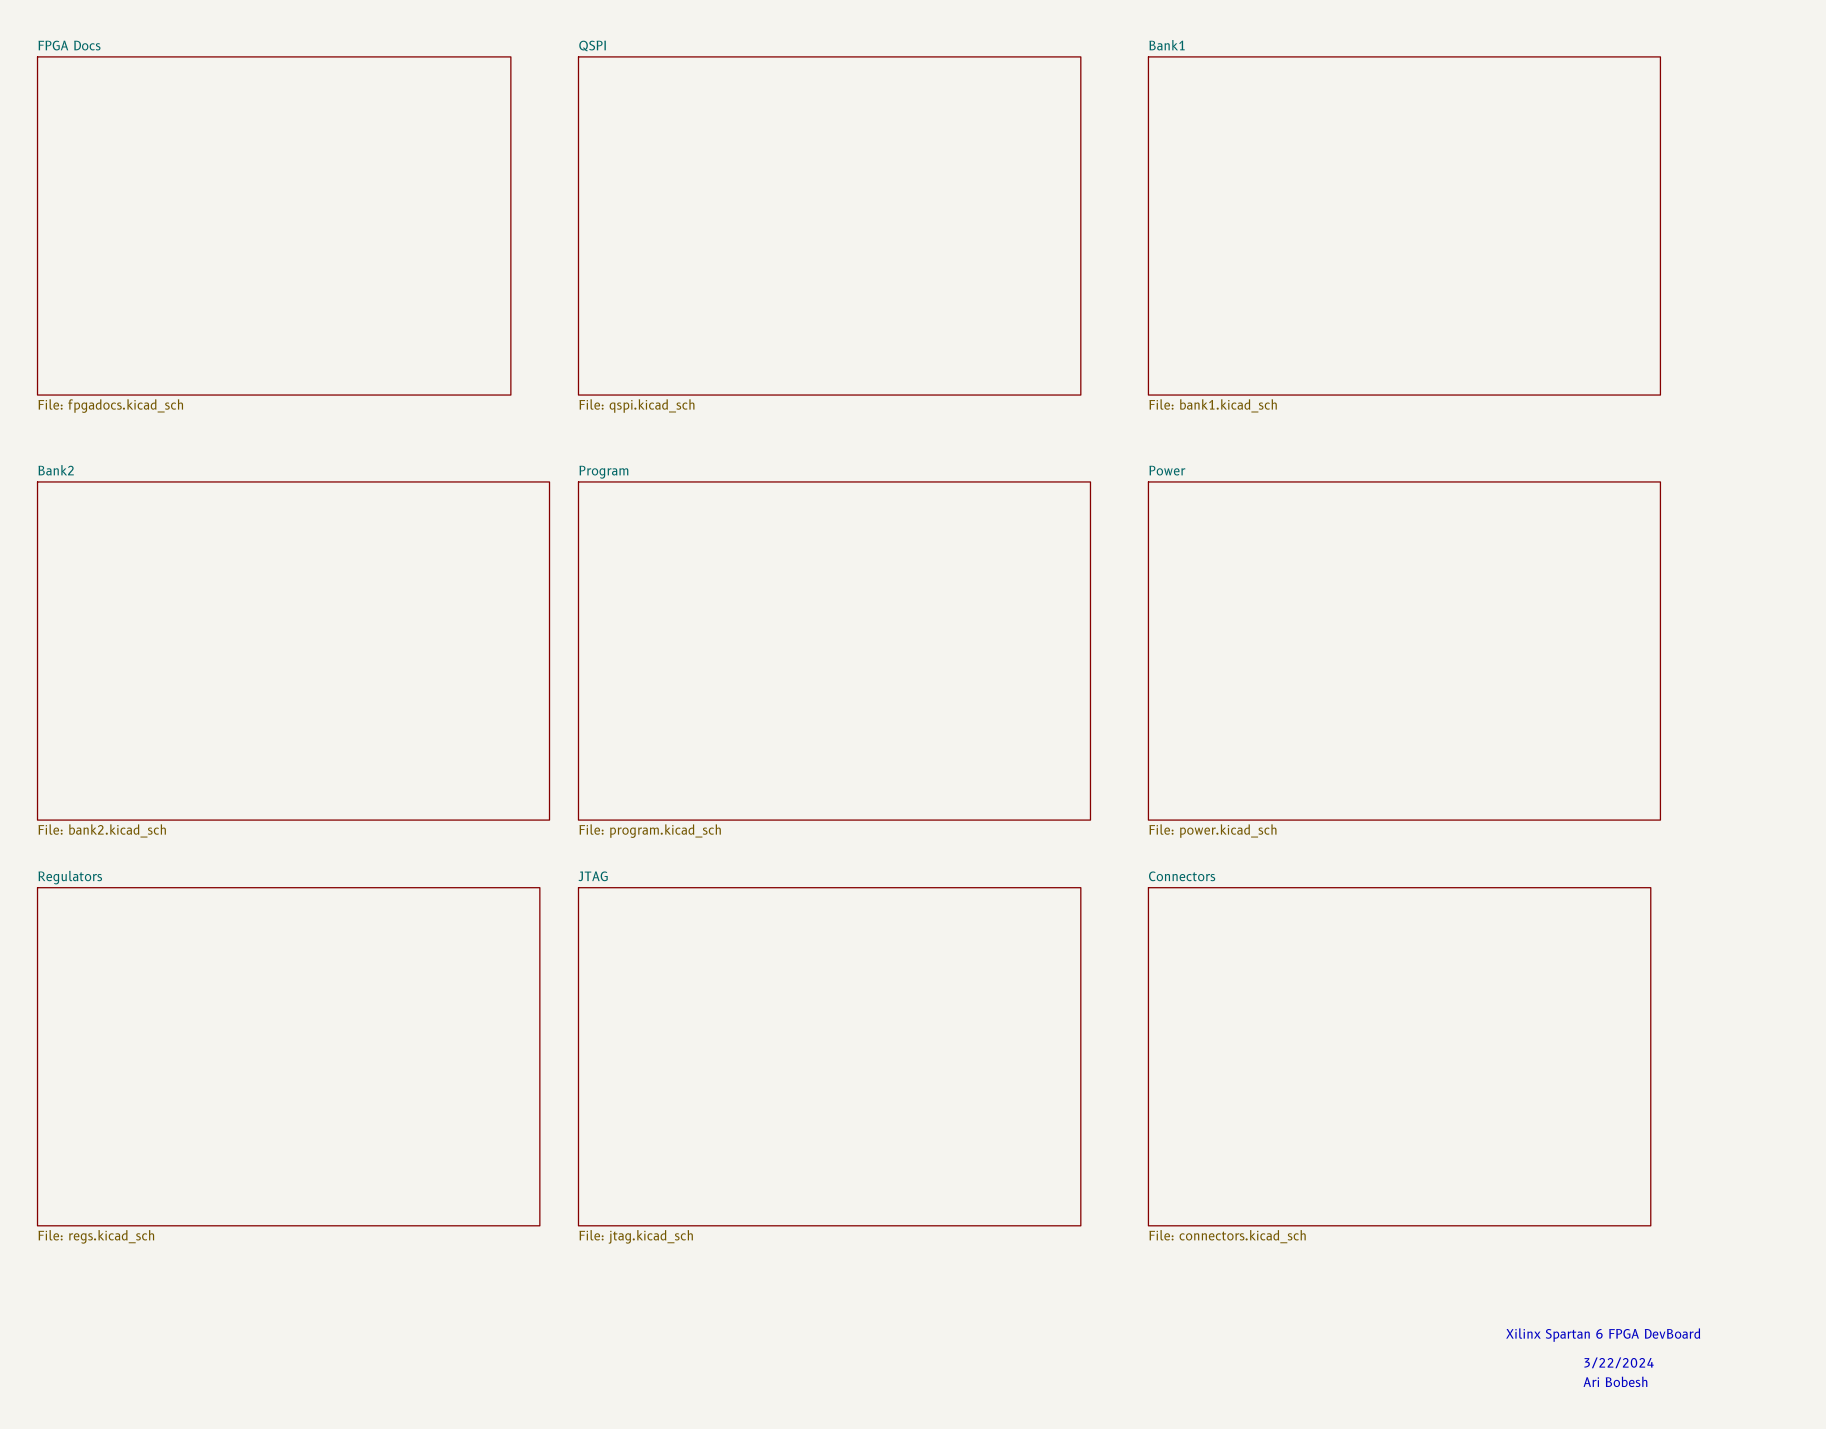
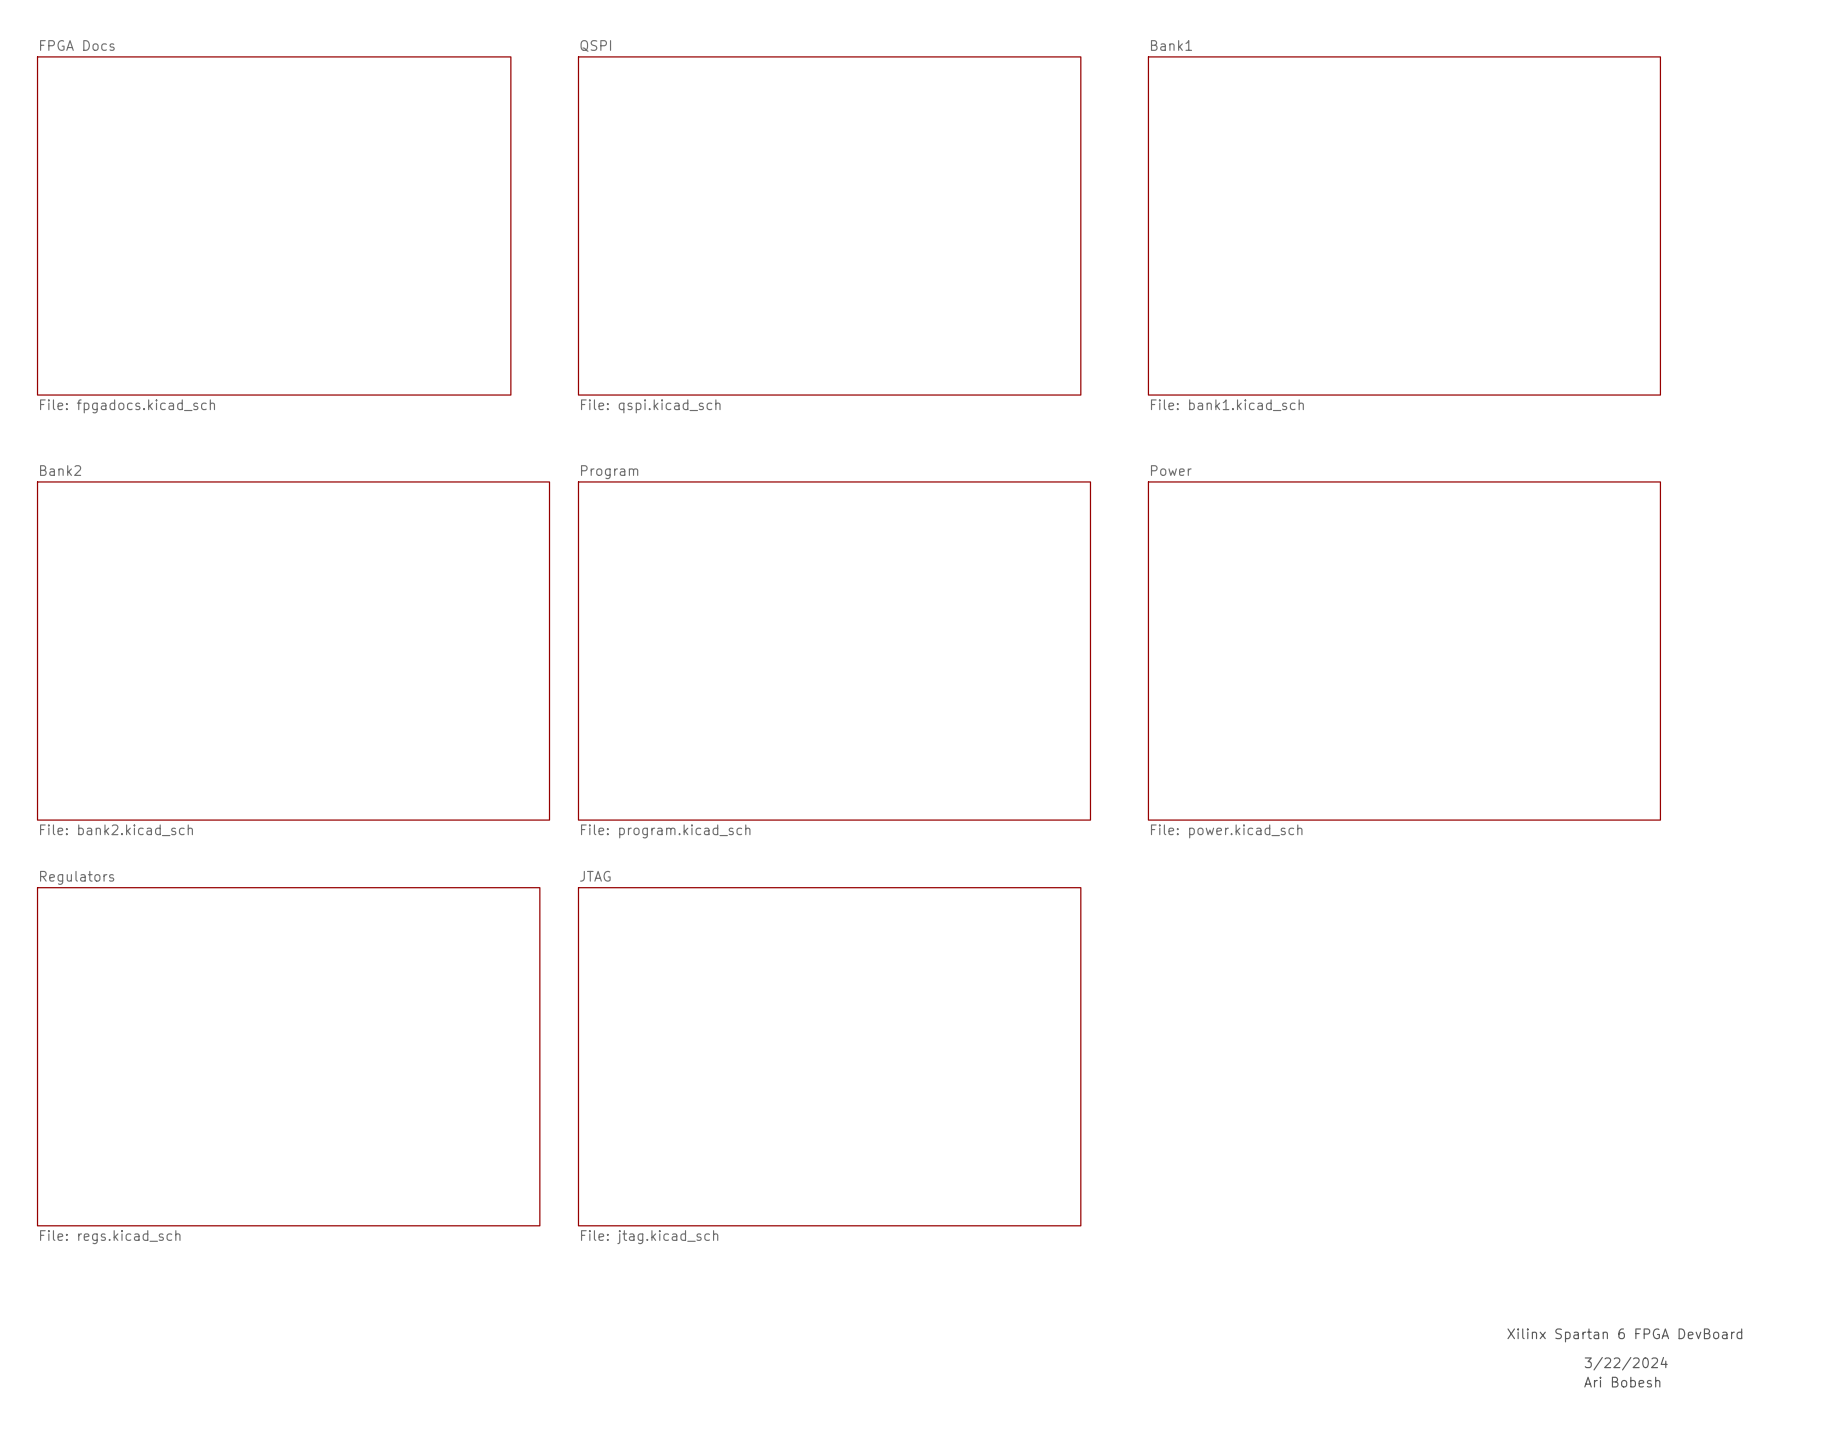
sheet Connectors: File: connectors.kicad_sch (1399, 1056) -> none

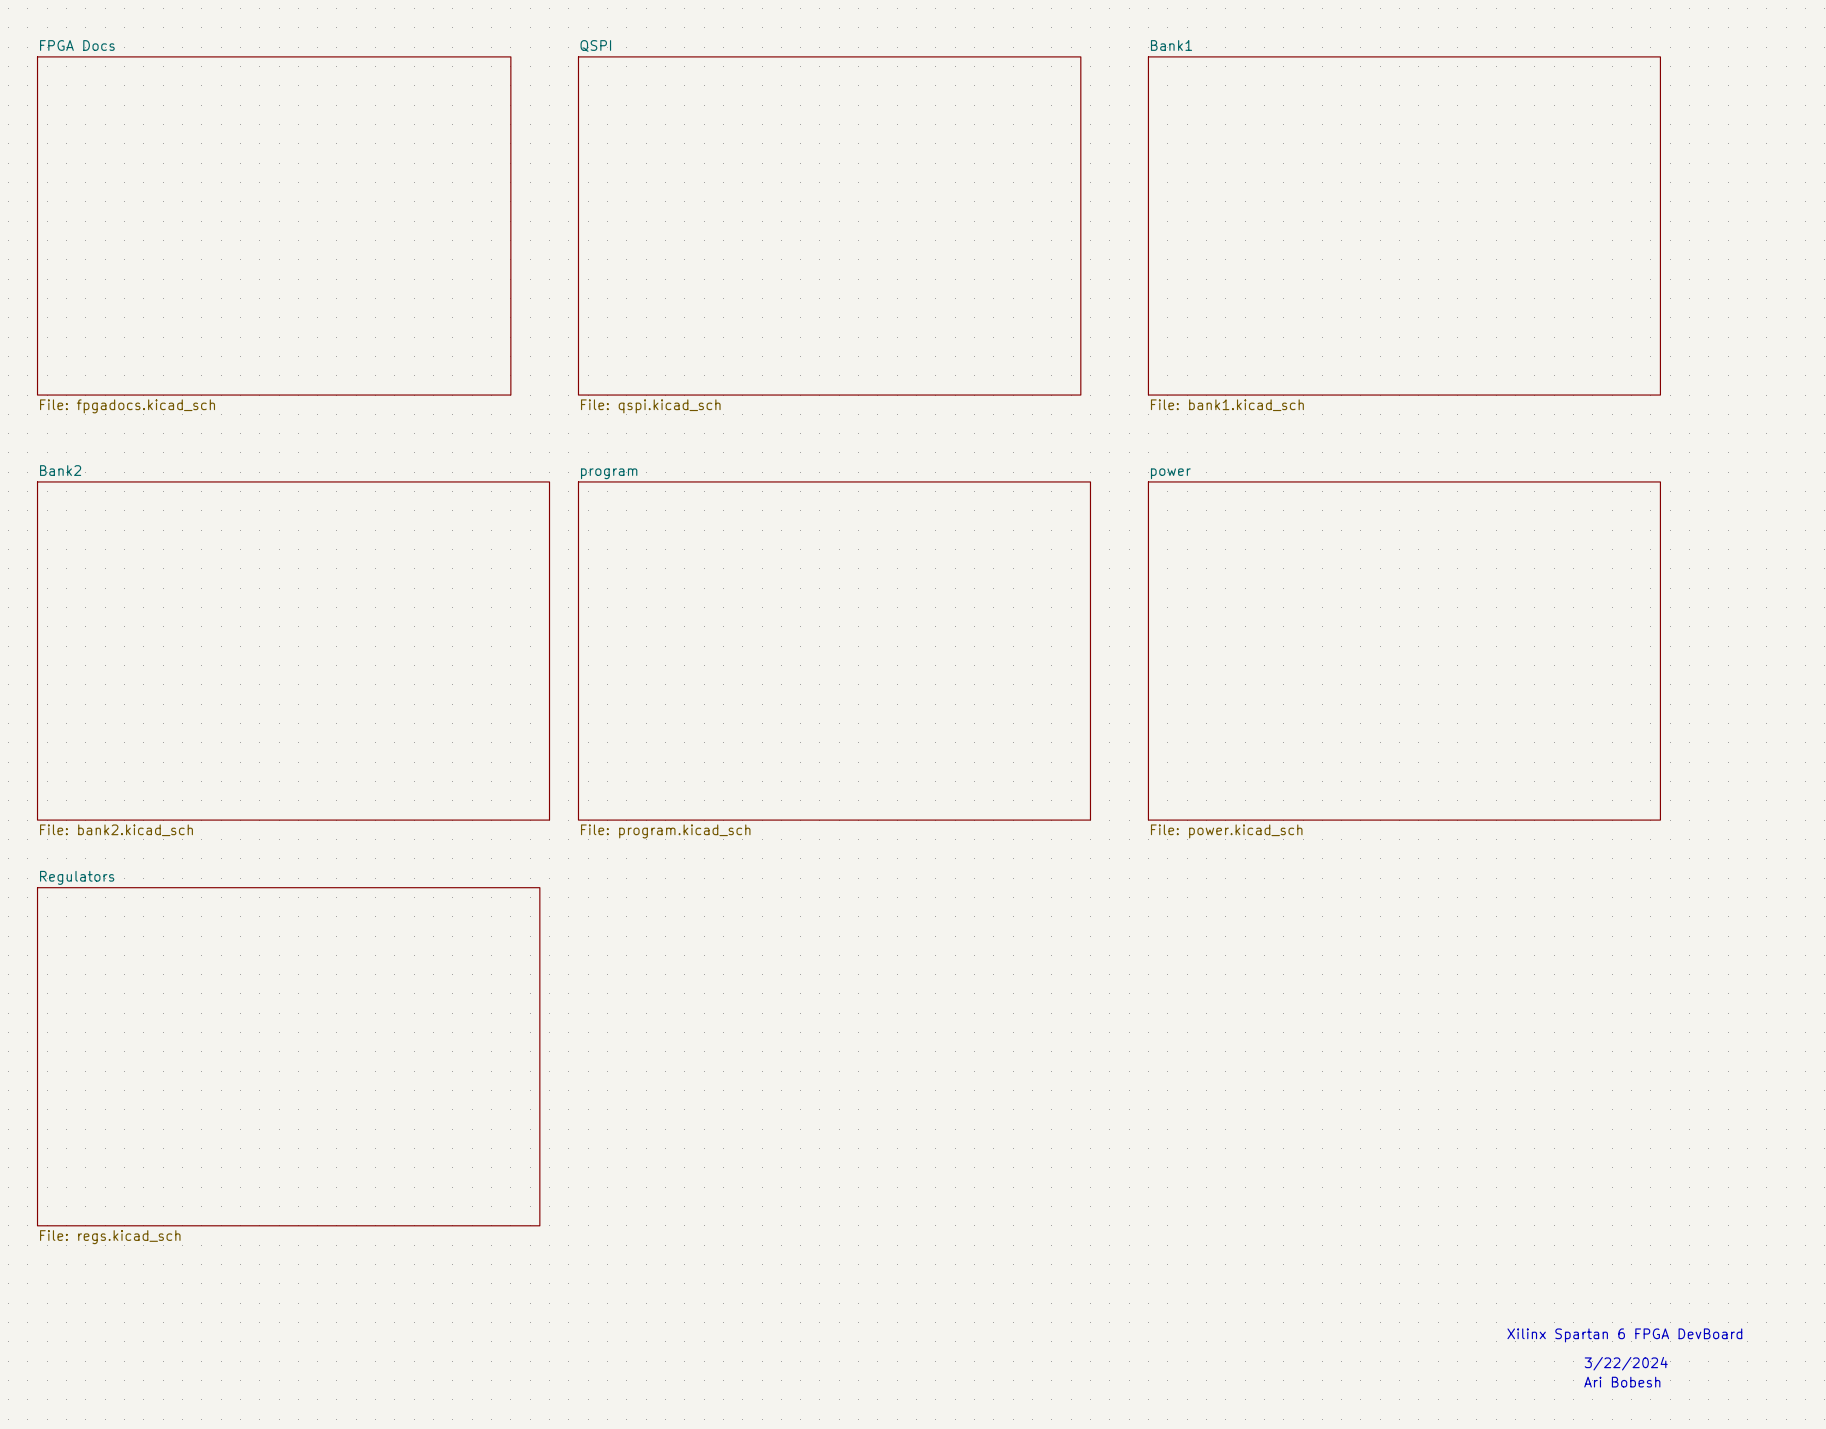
sheet Power name: Power (1171, 470) -> power (1170, 473)
sheet Program name: Program (609, 472) -> program (609, 473)
sheet JTAG: File: jtag.kicad_sch (829, 1056) -> none

